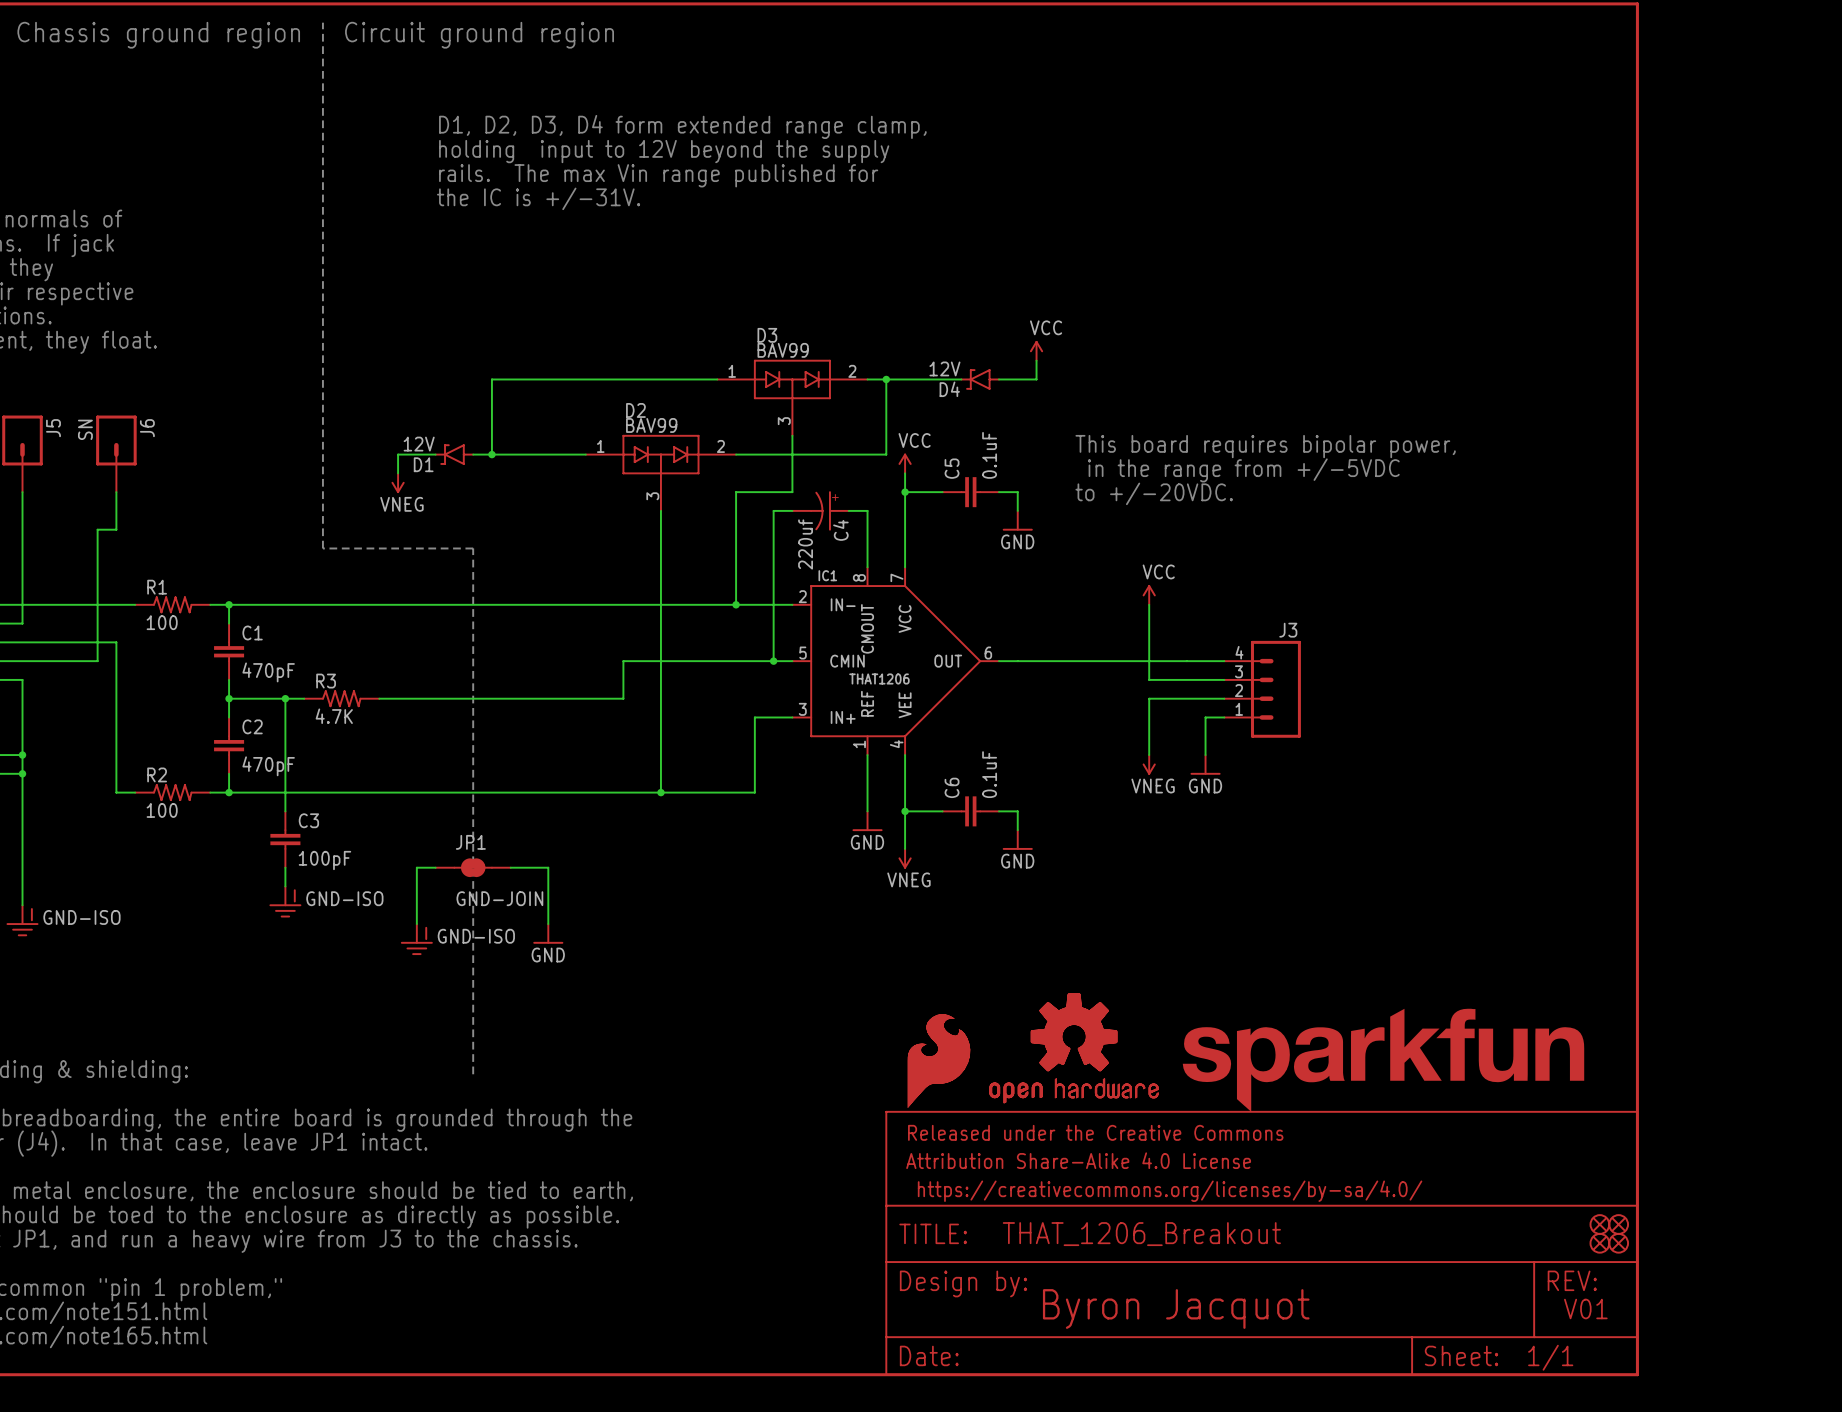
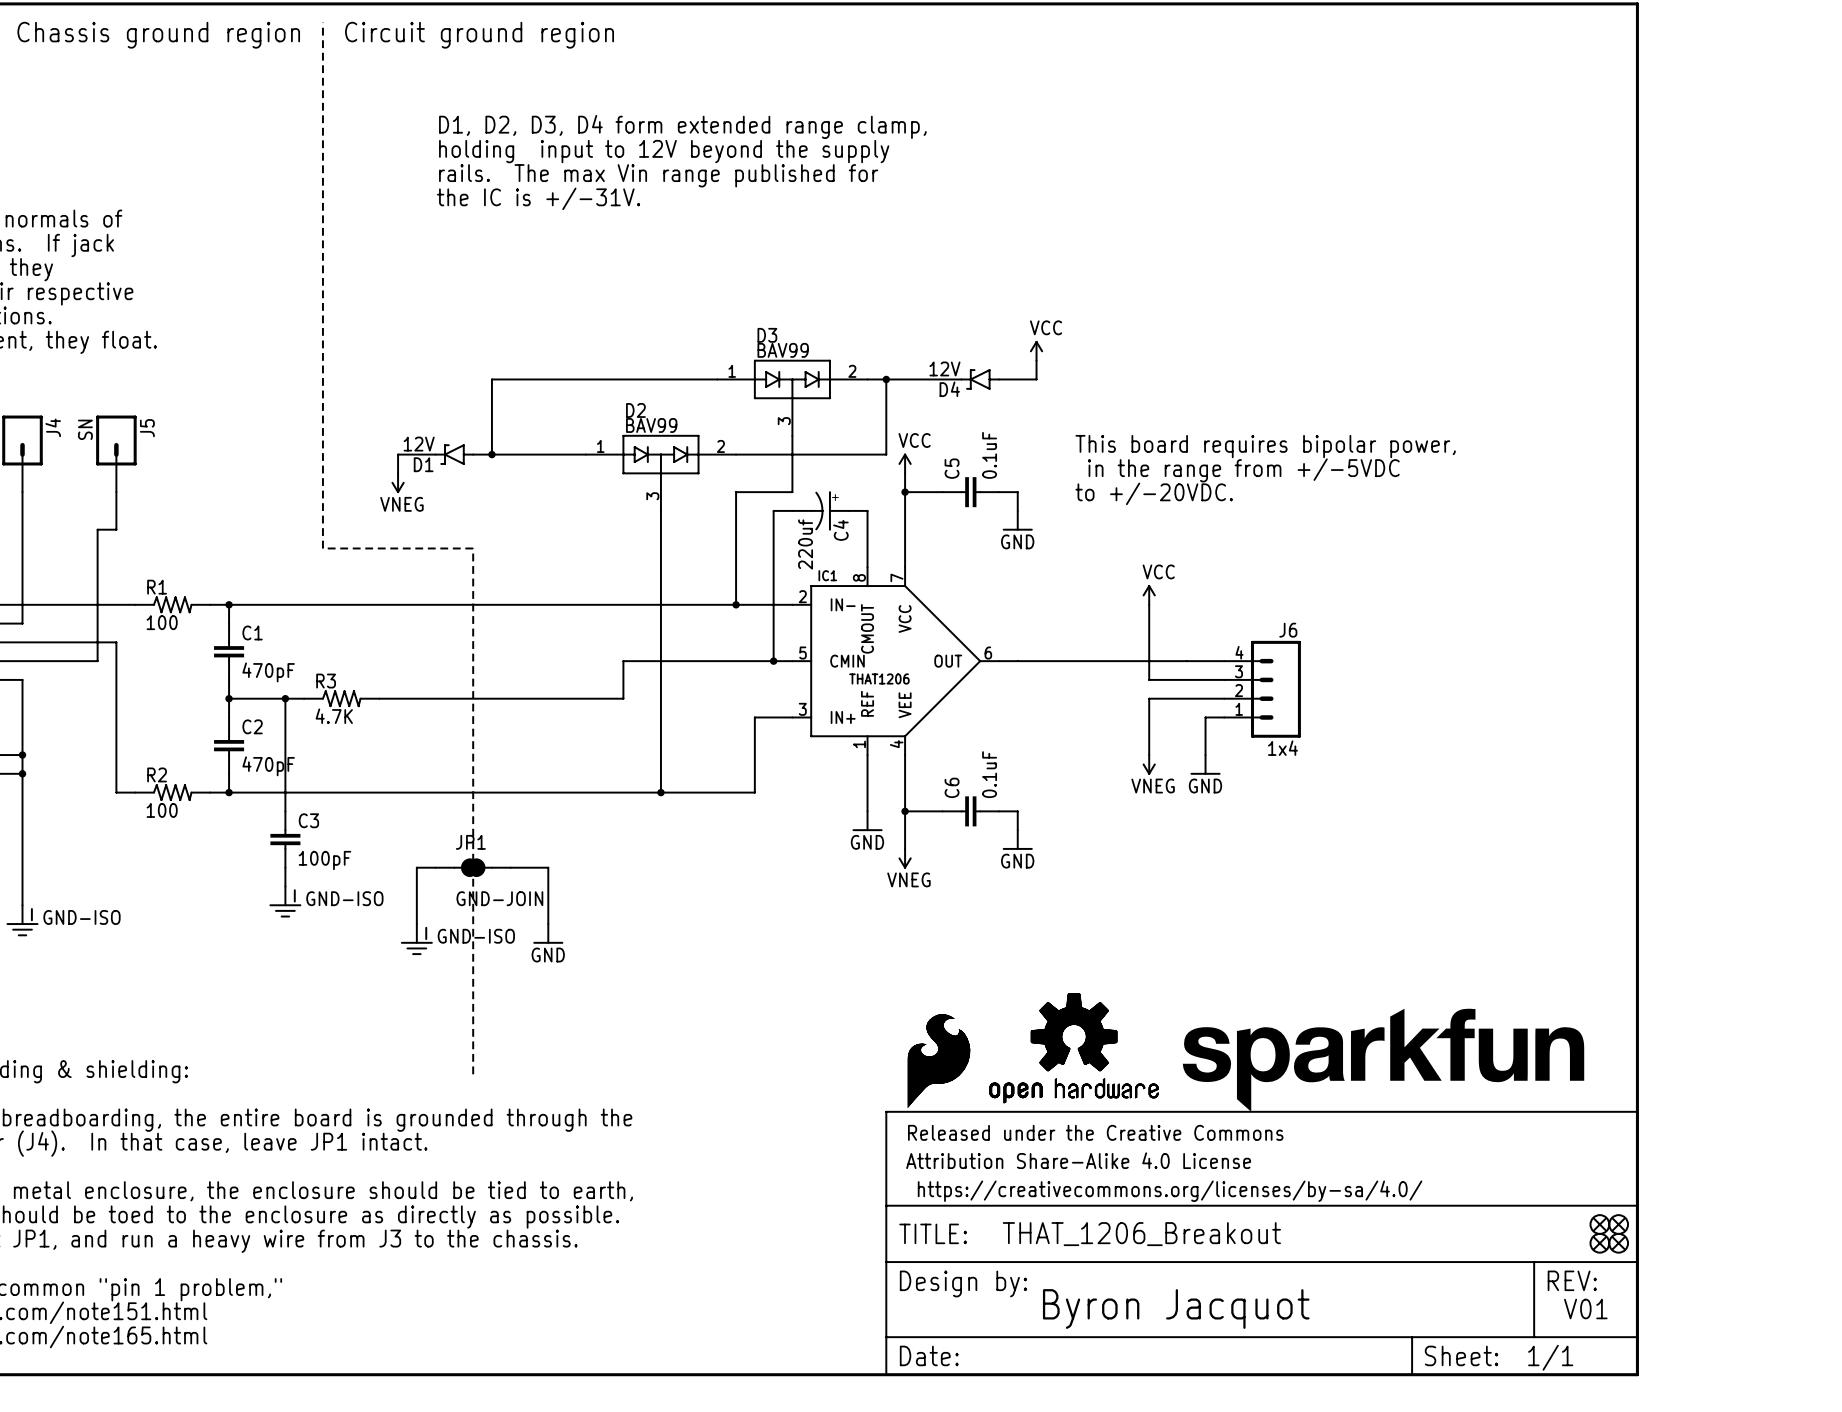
J5 name: J5 (53, 428) -> J4 (53, 427)
J6 name: J6 (147, 428) -> J5 (147, 428)
J3 name: J3 (1288, 630) -> J6 (1288, 630)
J3 value: none -> 1x4 (1282, 748)

